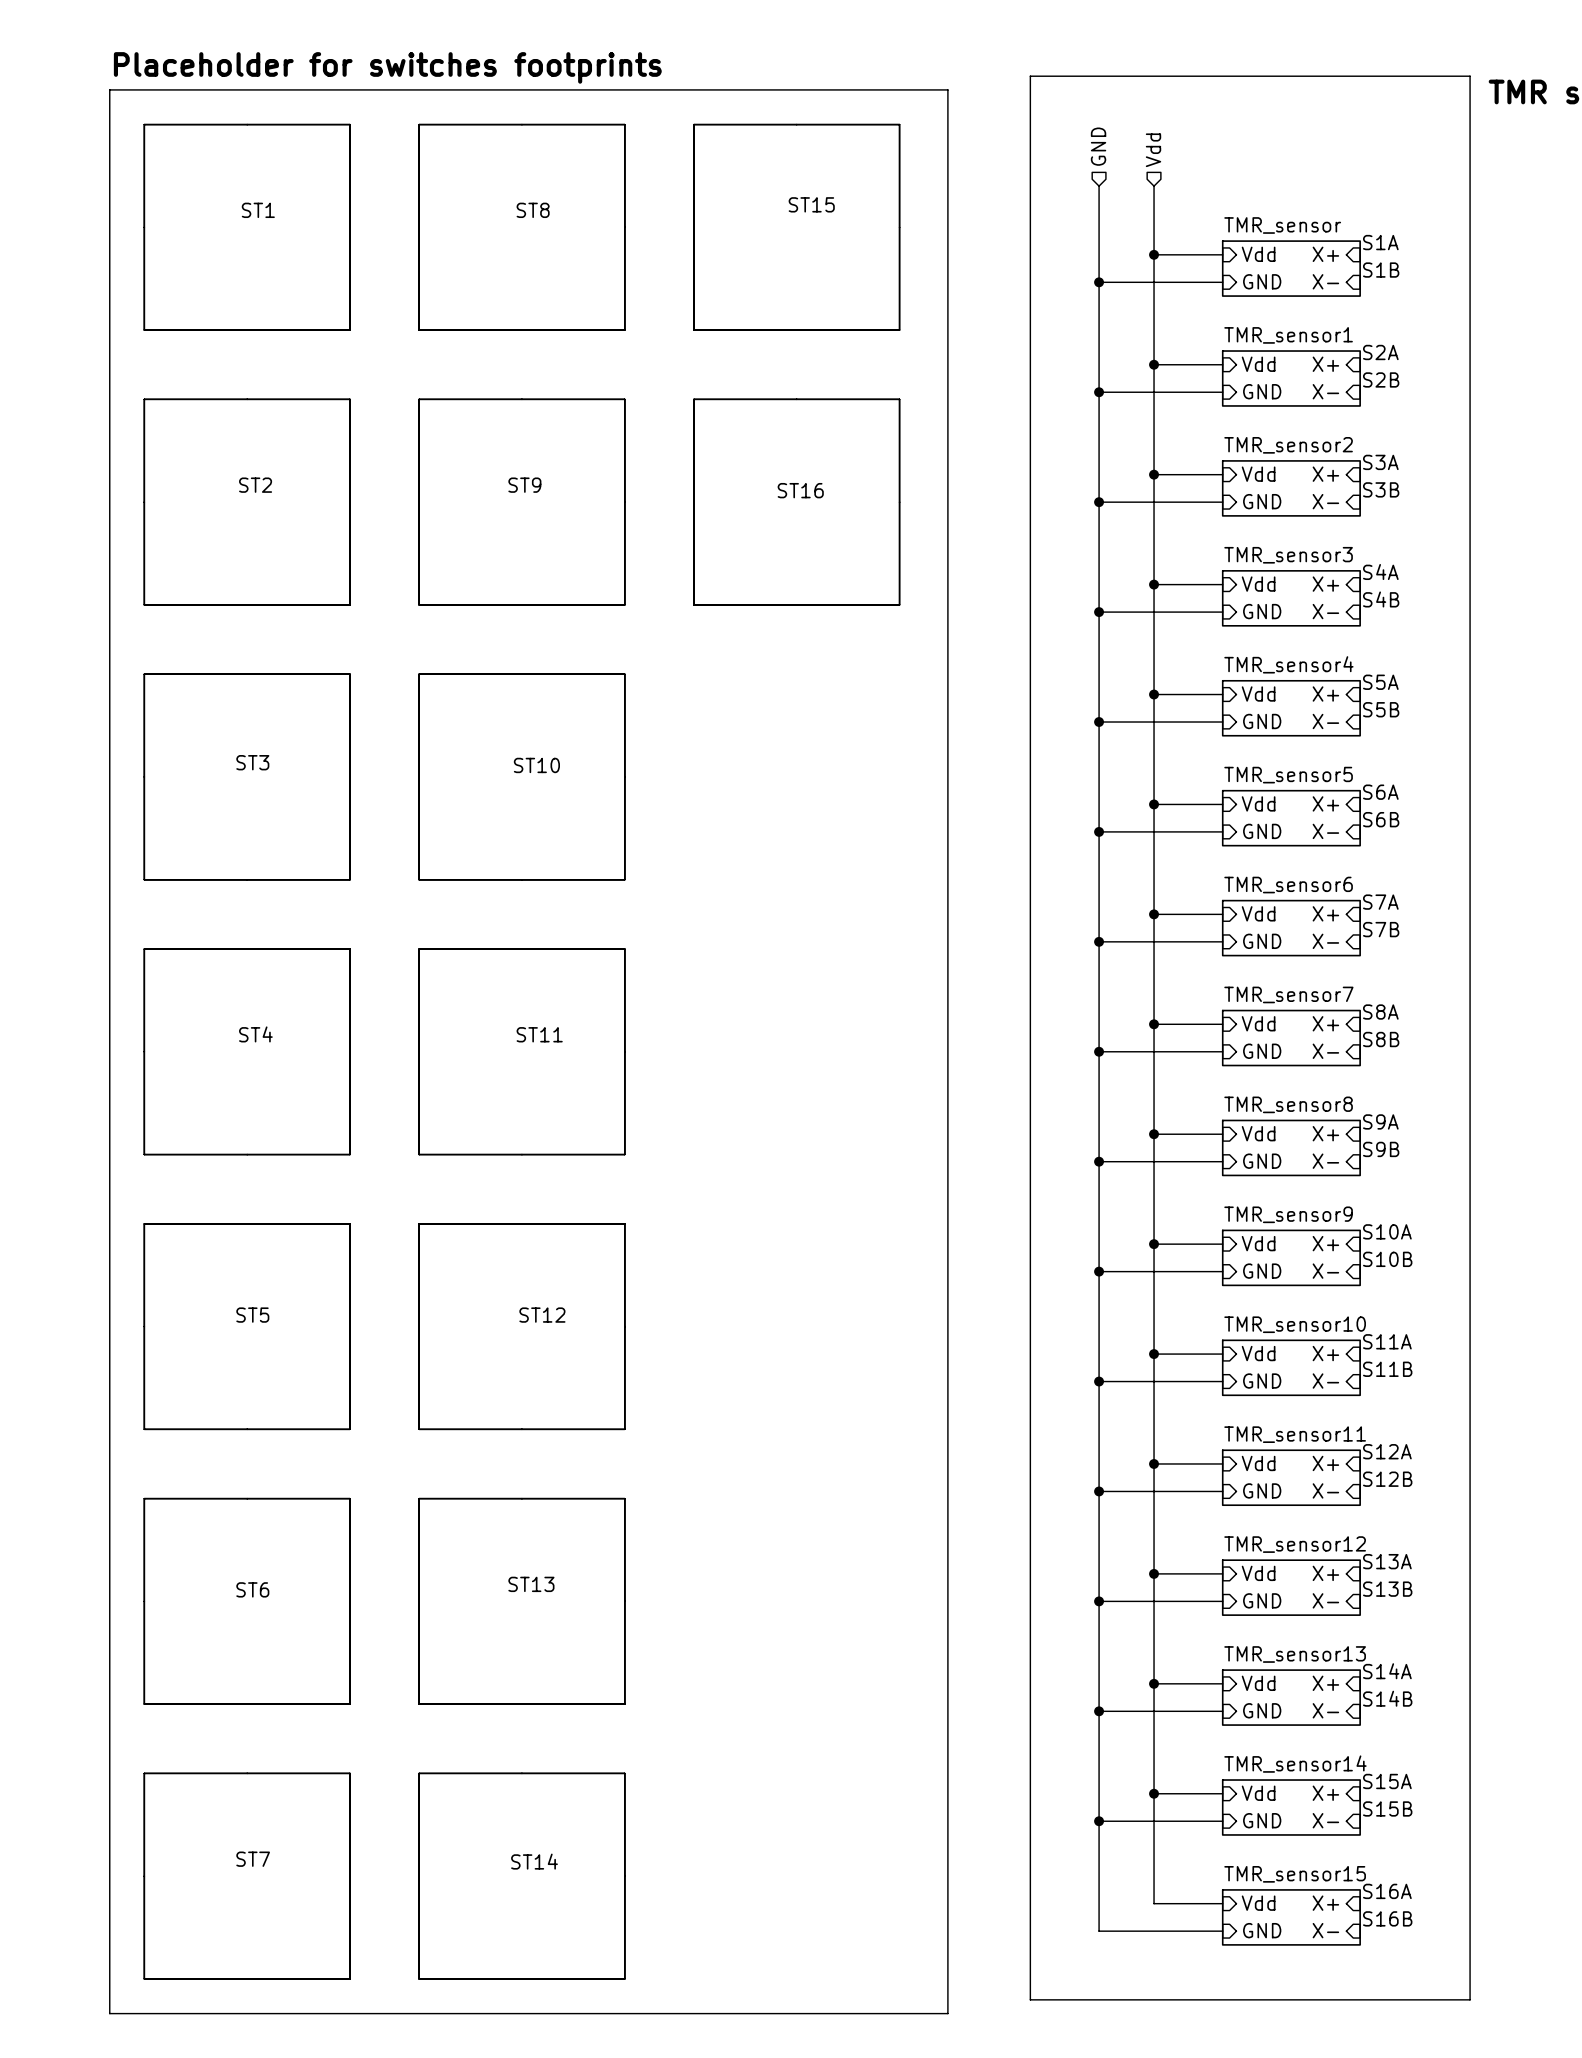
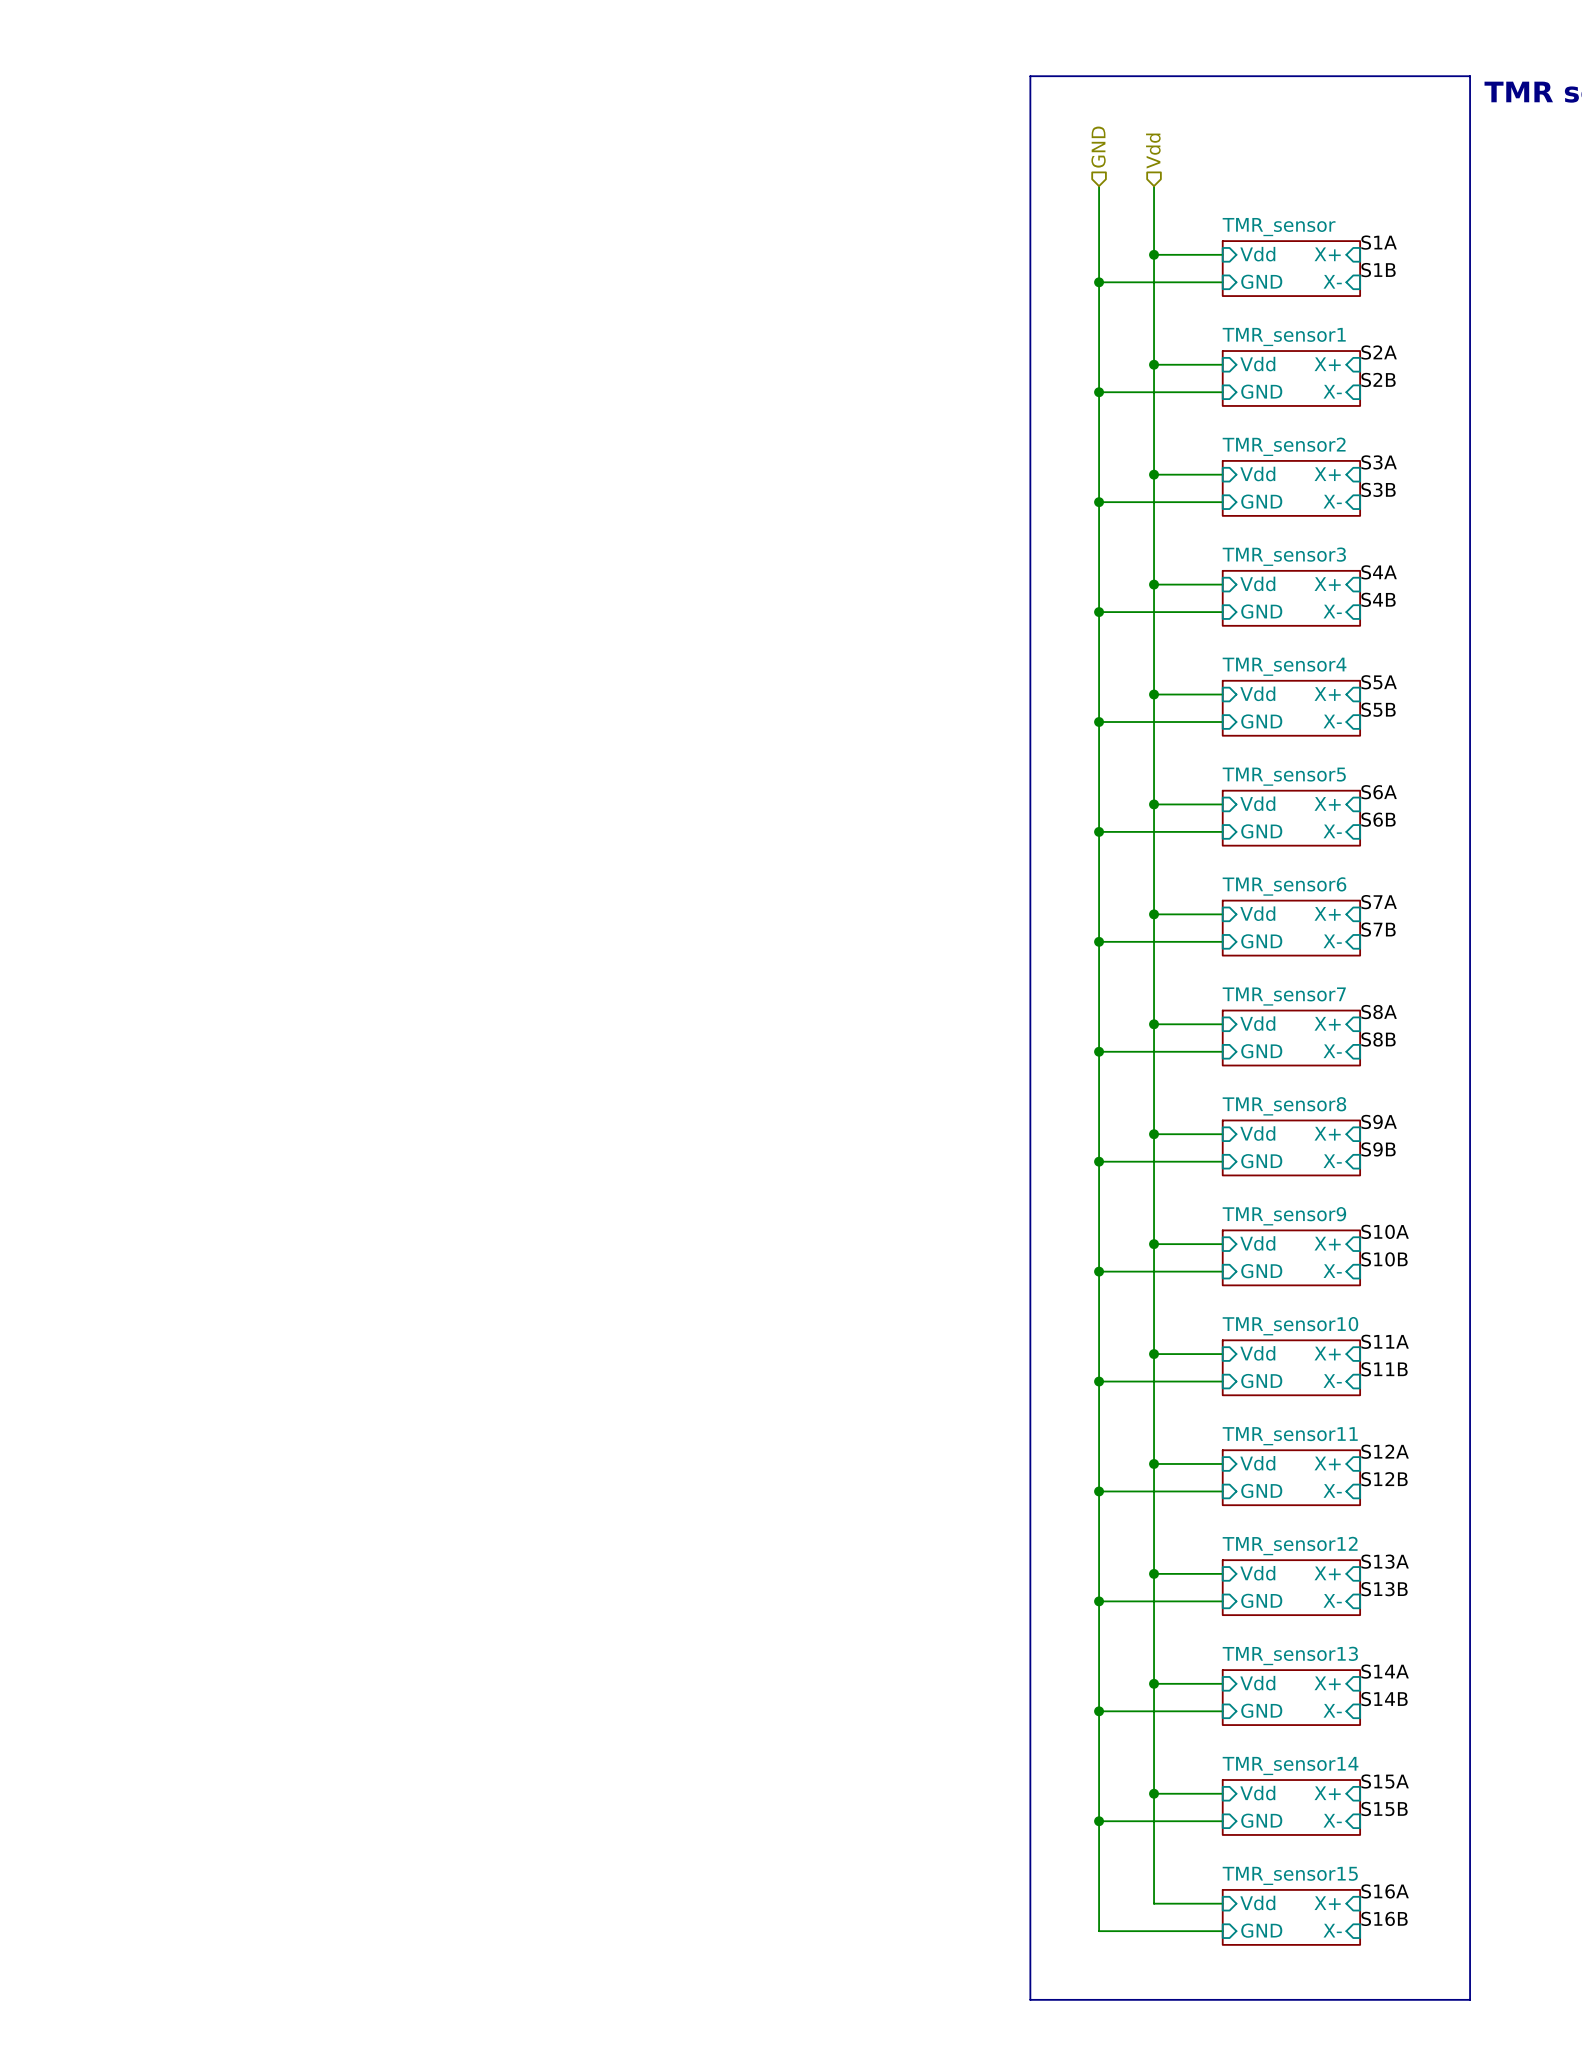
text: Placeholder for switches footprints (387, 67) -> none
line: (109, 89) (947, 89) (947, 2013) (109, 2013) (109, 89) -> none
ST1: (247, 227) -> none
ST8: (521, 227) -> none
ST15: (796, 227) -> none
ST2: (247, 502) -> none
ST9: (521, 502) -> none
ST16: (796, 502) -> none
ST3: (247, 776) -> none
ST10: (521, 776) -> none
ST4: (247, 1051) -> none
ST11: (521, 1051) -> none
ST5: (247, 1326) -> none
ST12: (521, 1326) -> none
ST6: (247, 1601) -> none
ST13: (521, 1601) -> none
ST7: (247, 1876) -> none
ST14: (521, 1876) -> none

